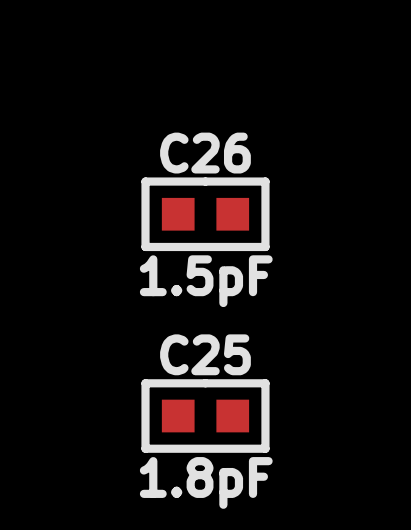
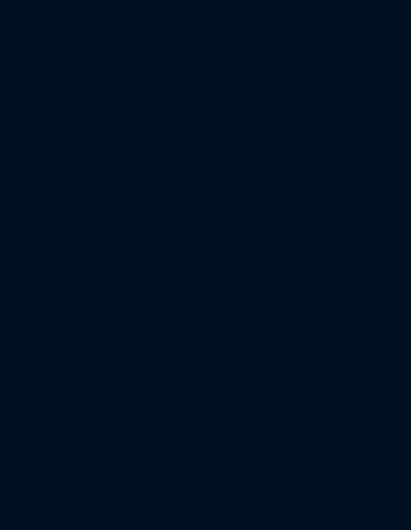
C26: 1.5pF (205, 214) -> none
C25: 1.8pF (205, 416) -> none

